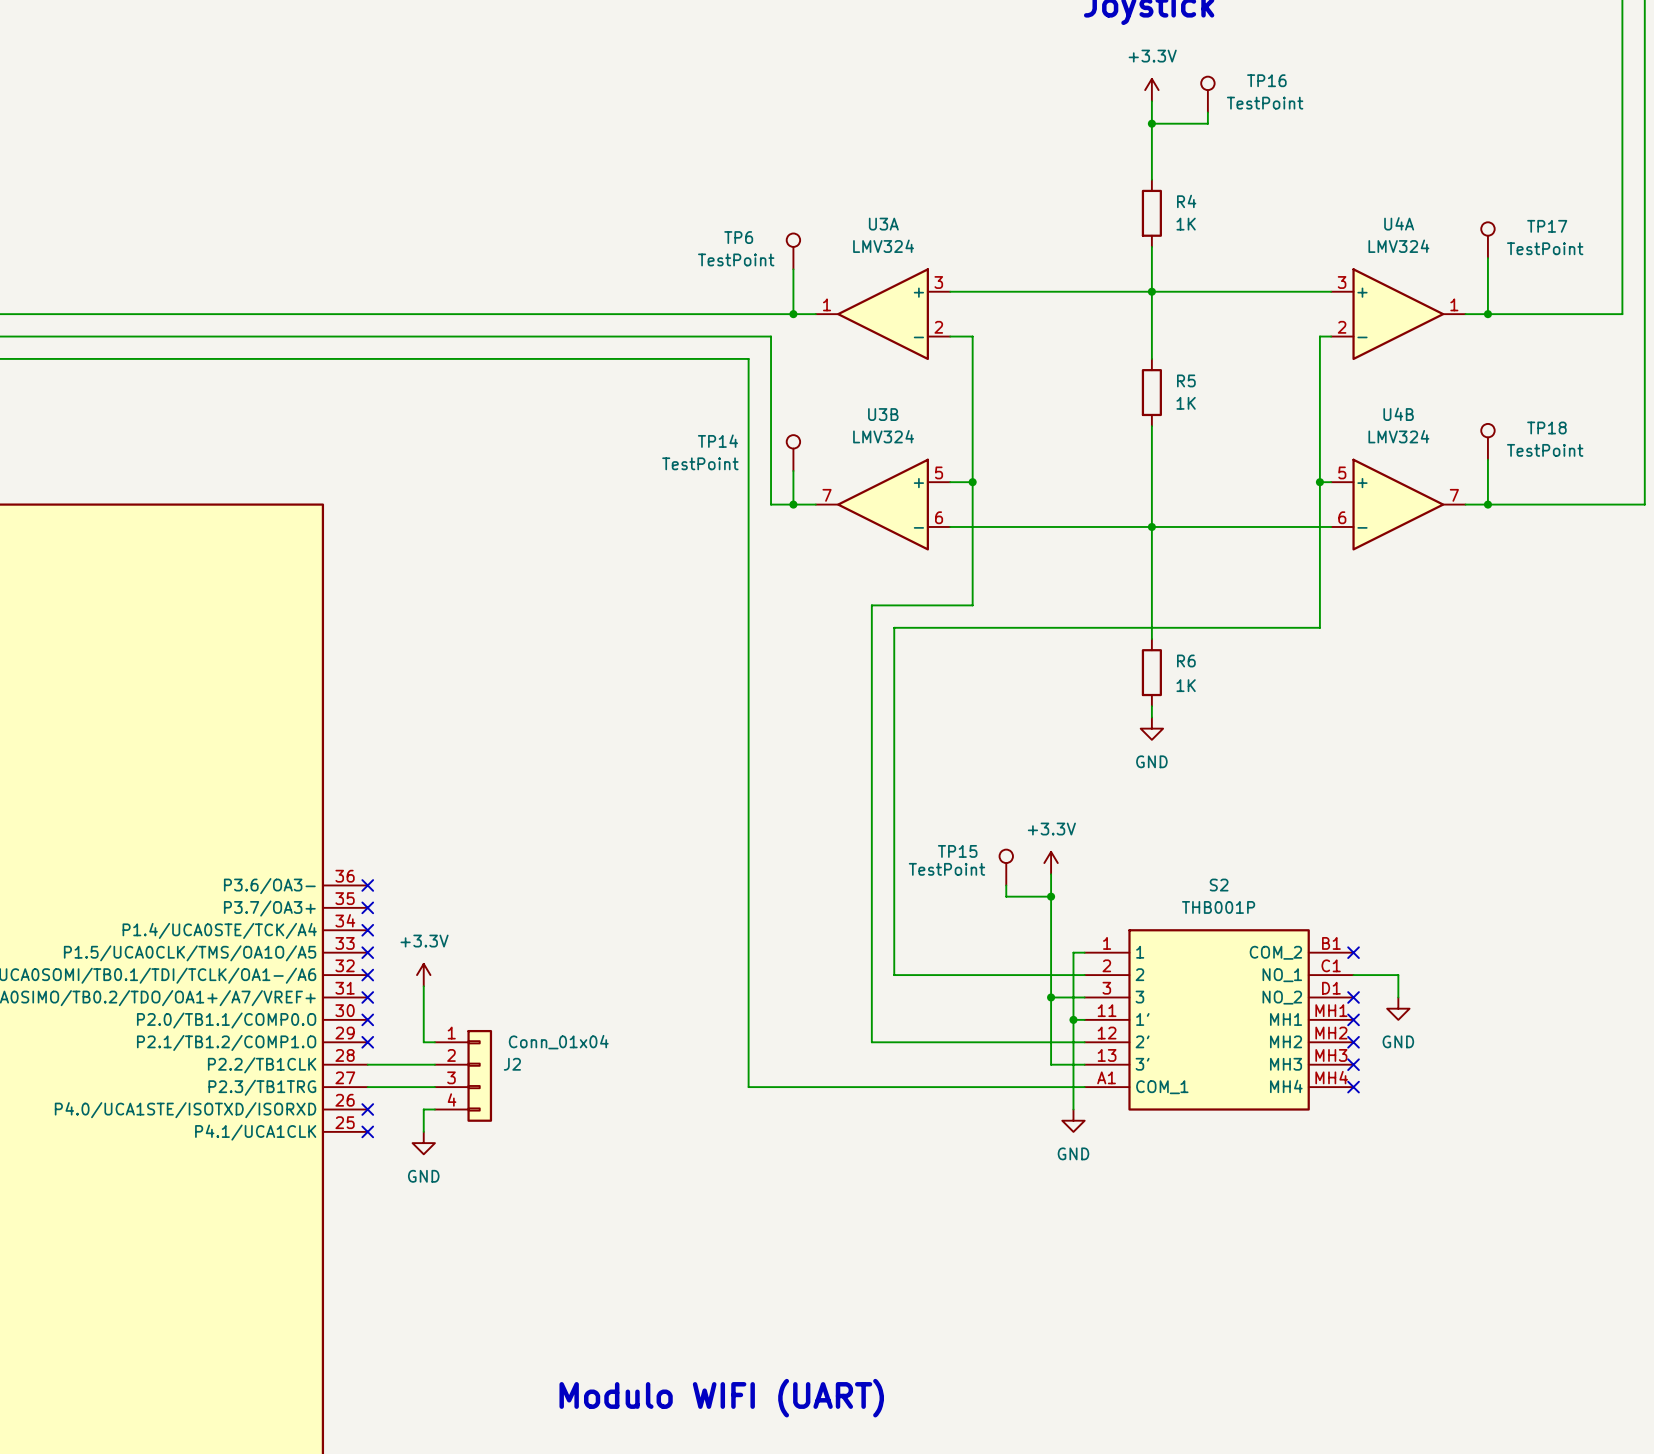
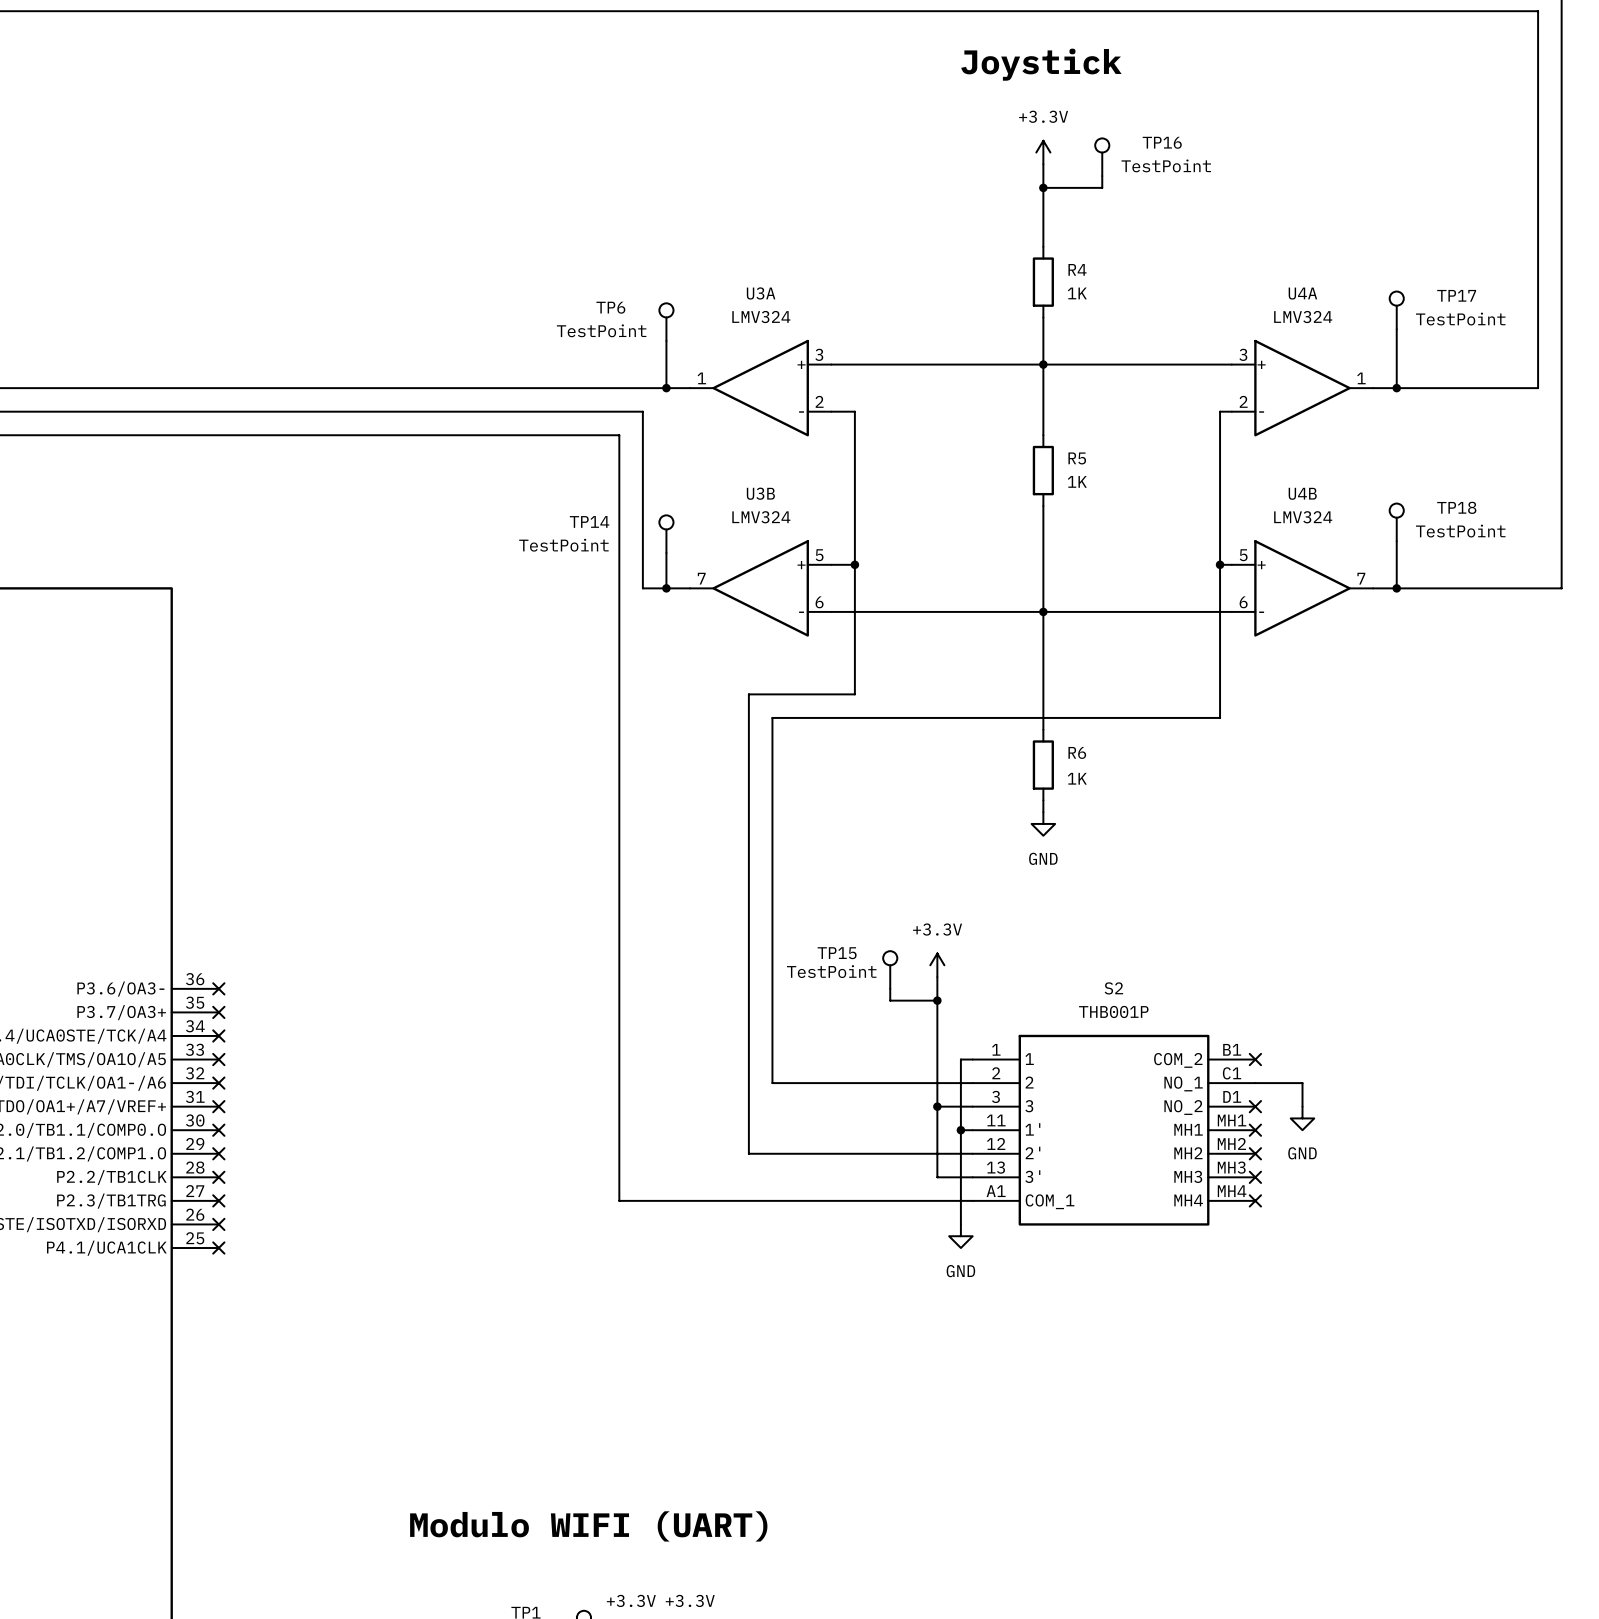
power symbol: +3.3V (423, 975) -> none
wire: (423, 986) (423, 1042) (434, 1042) -> none
wire: (367, 1064) (434, 1064) -> none
no-connect mark: none -> (218, 1177)
J2: Conn_01x04 (463, 1075) -> none
wire: (367, 1087) (434, 1087) -> none
no-connect mark: none -> (218, 1200)
wire: (434, 1109) (423, 1109) (423, 1131) -> none
power symbol: GND (423, 1143) -> none

